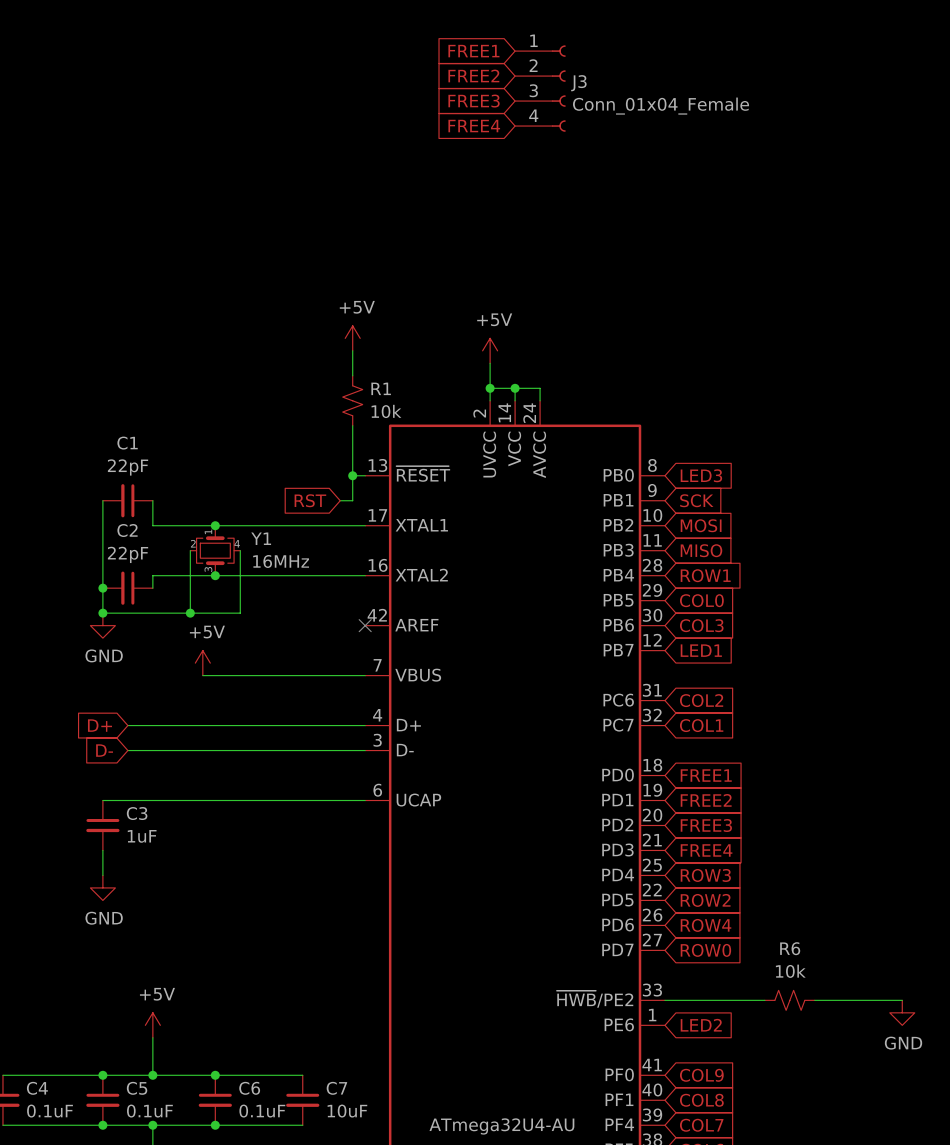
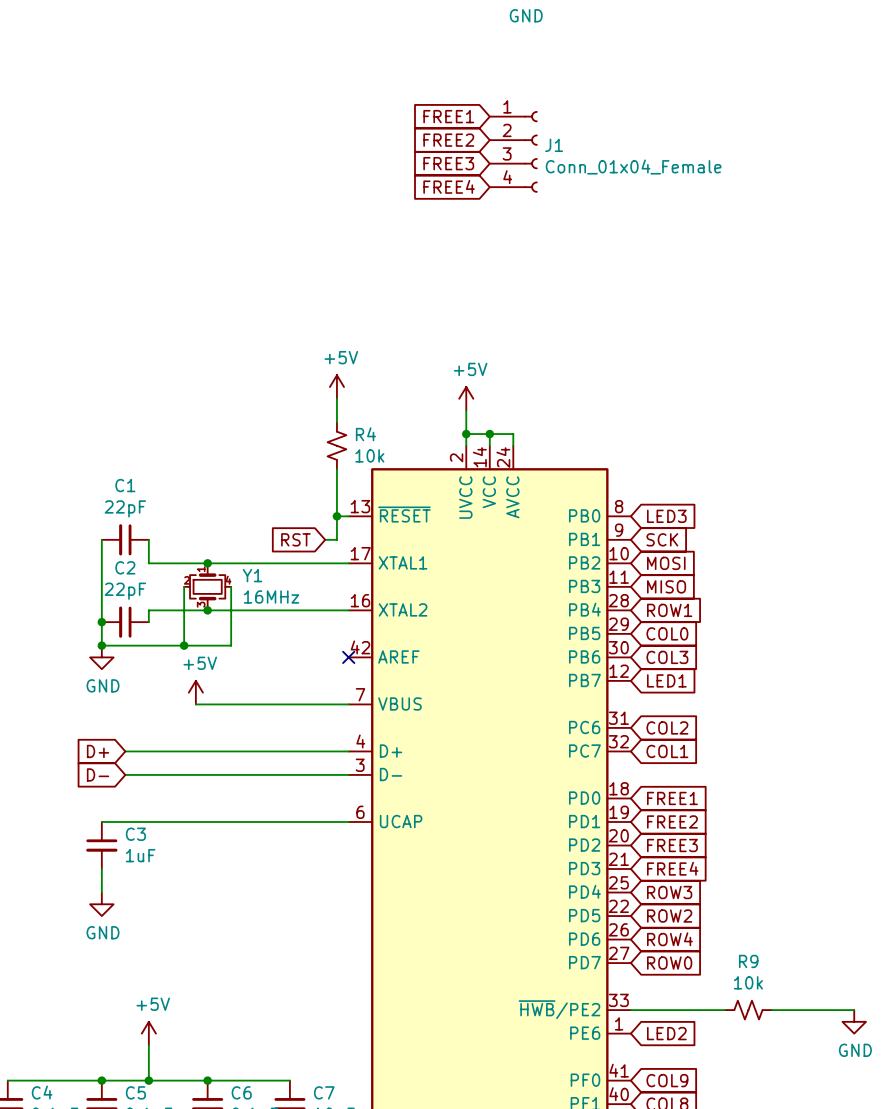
J3 name: J3 (578, 83) -> J1 (554, 145)
R1 name: R1 (381, 388) -> R4 (365, 434)
R6 name: R6 (790, 948) -> R9 (748, 961)

